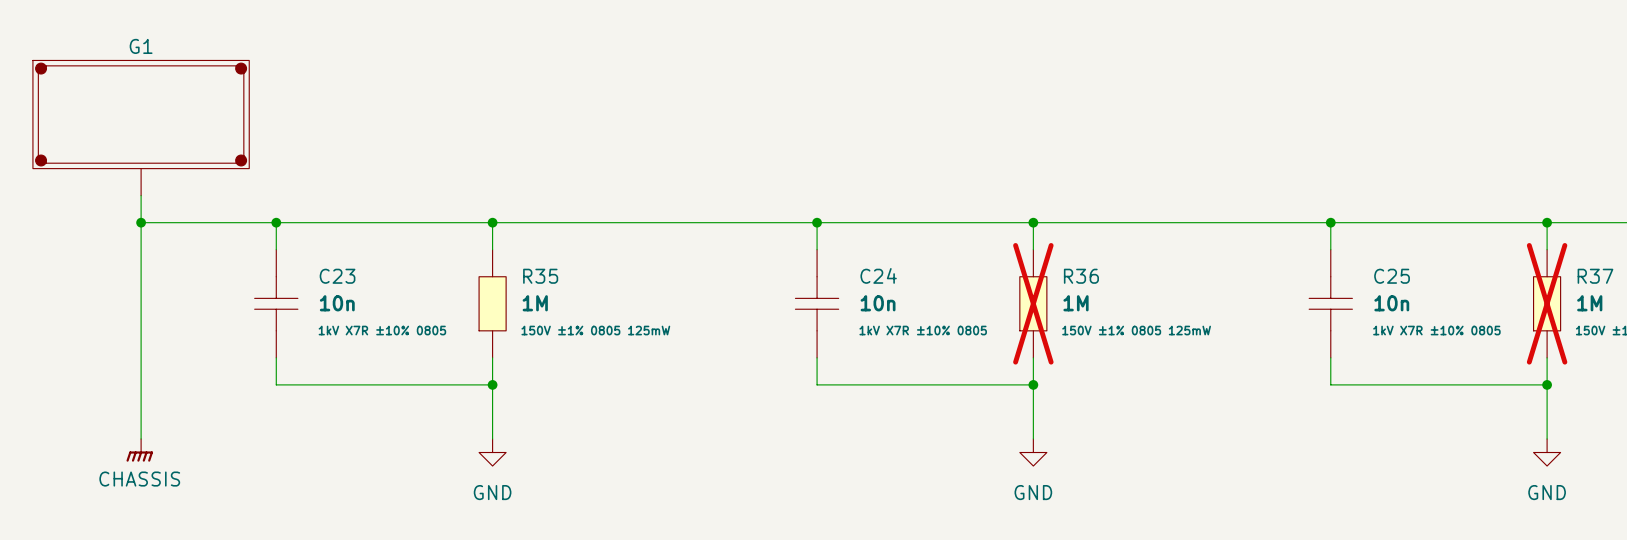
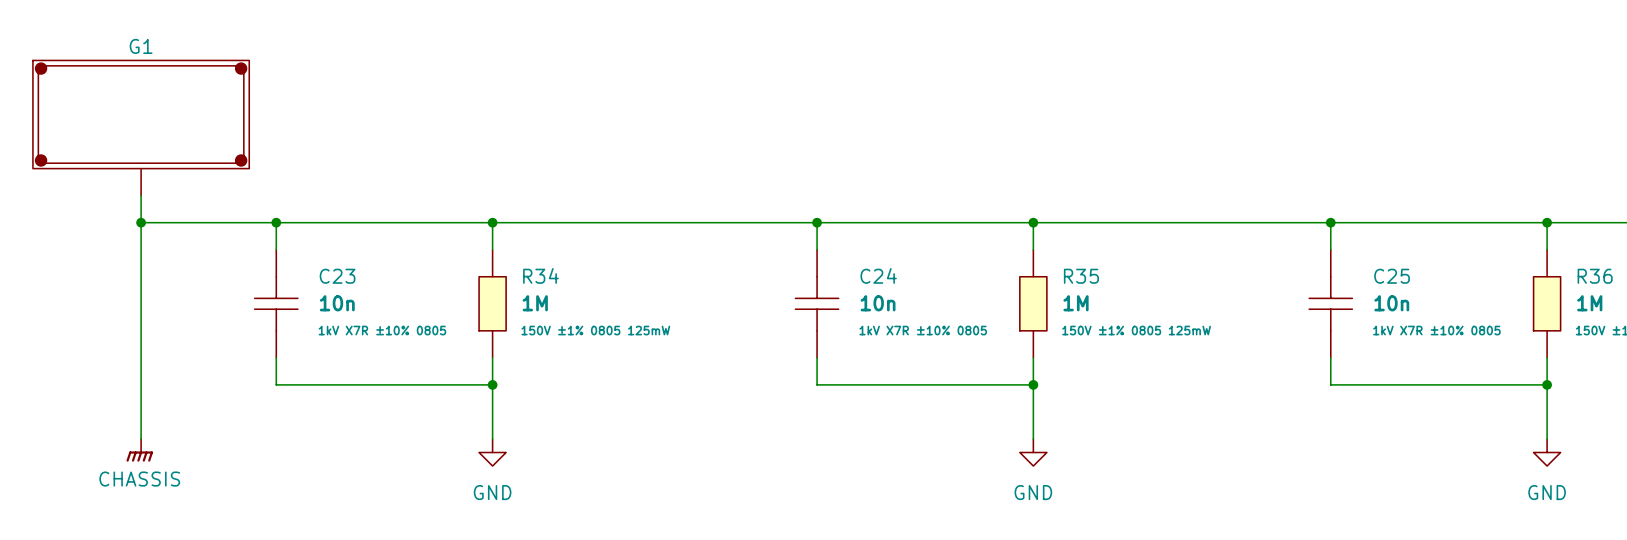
R35 name: R35 (540, 276) -> R34 (540, 275)
R36 name: R36 (1081, 276) -> R35 (1081, 276)
R37 name: R37 (1595, 276) -> R36 (1595, 276)
R36 do-not-place cross: (1033, 303) -> none
R37 do-not-place cross: (1547, 303) -> none

